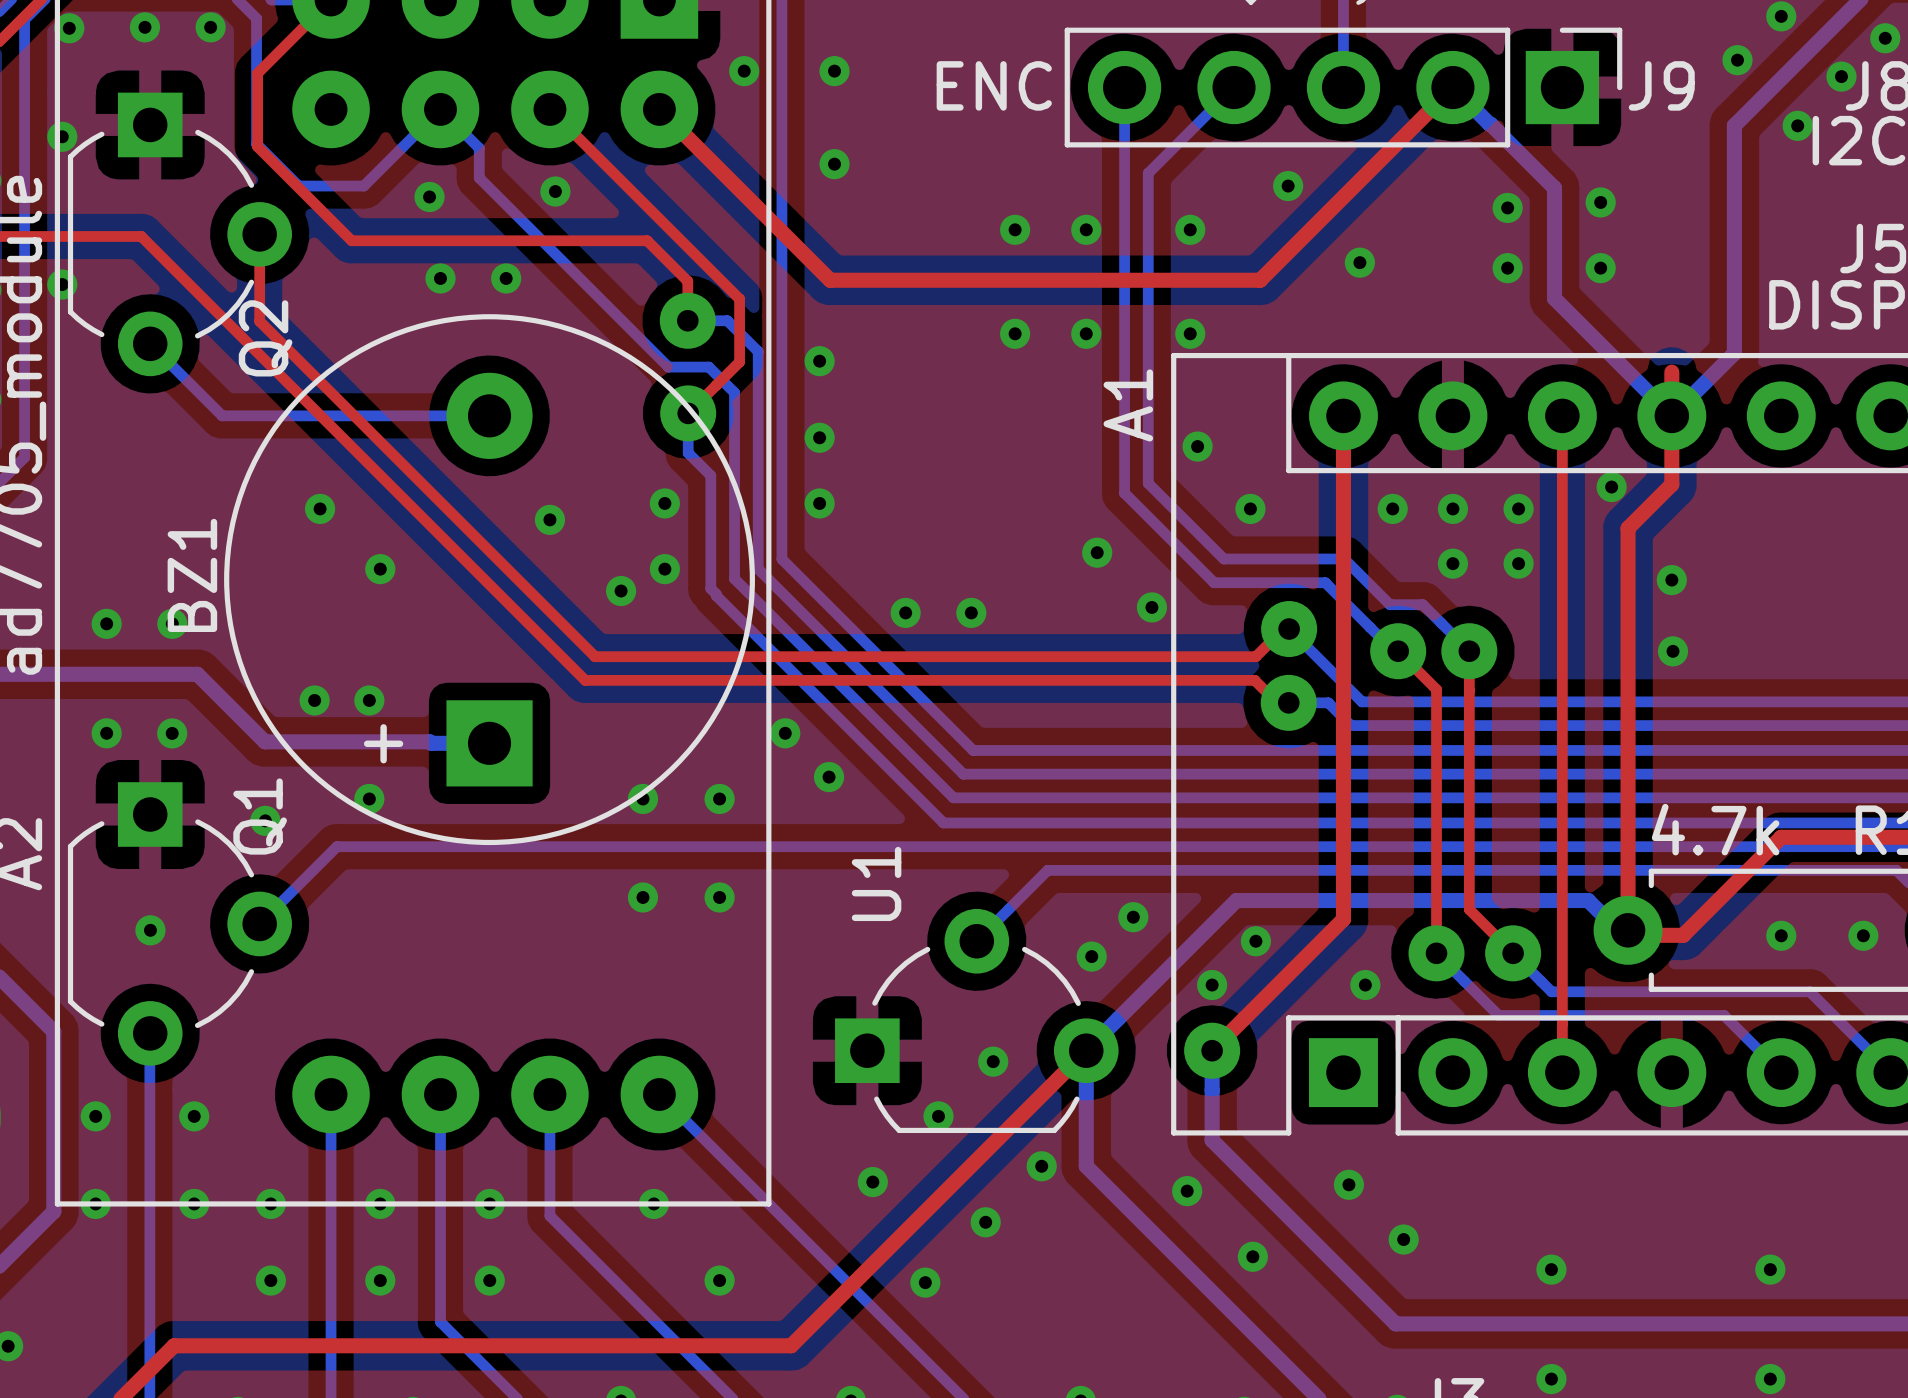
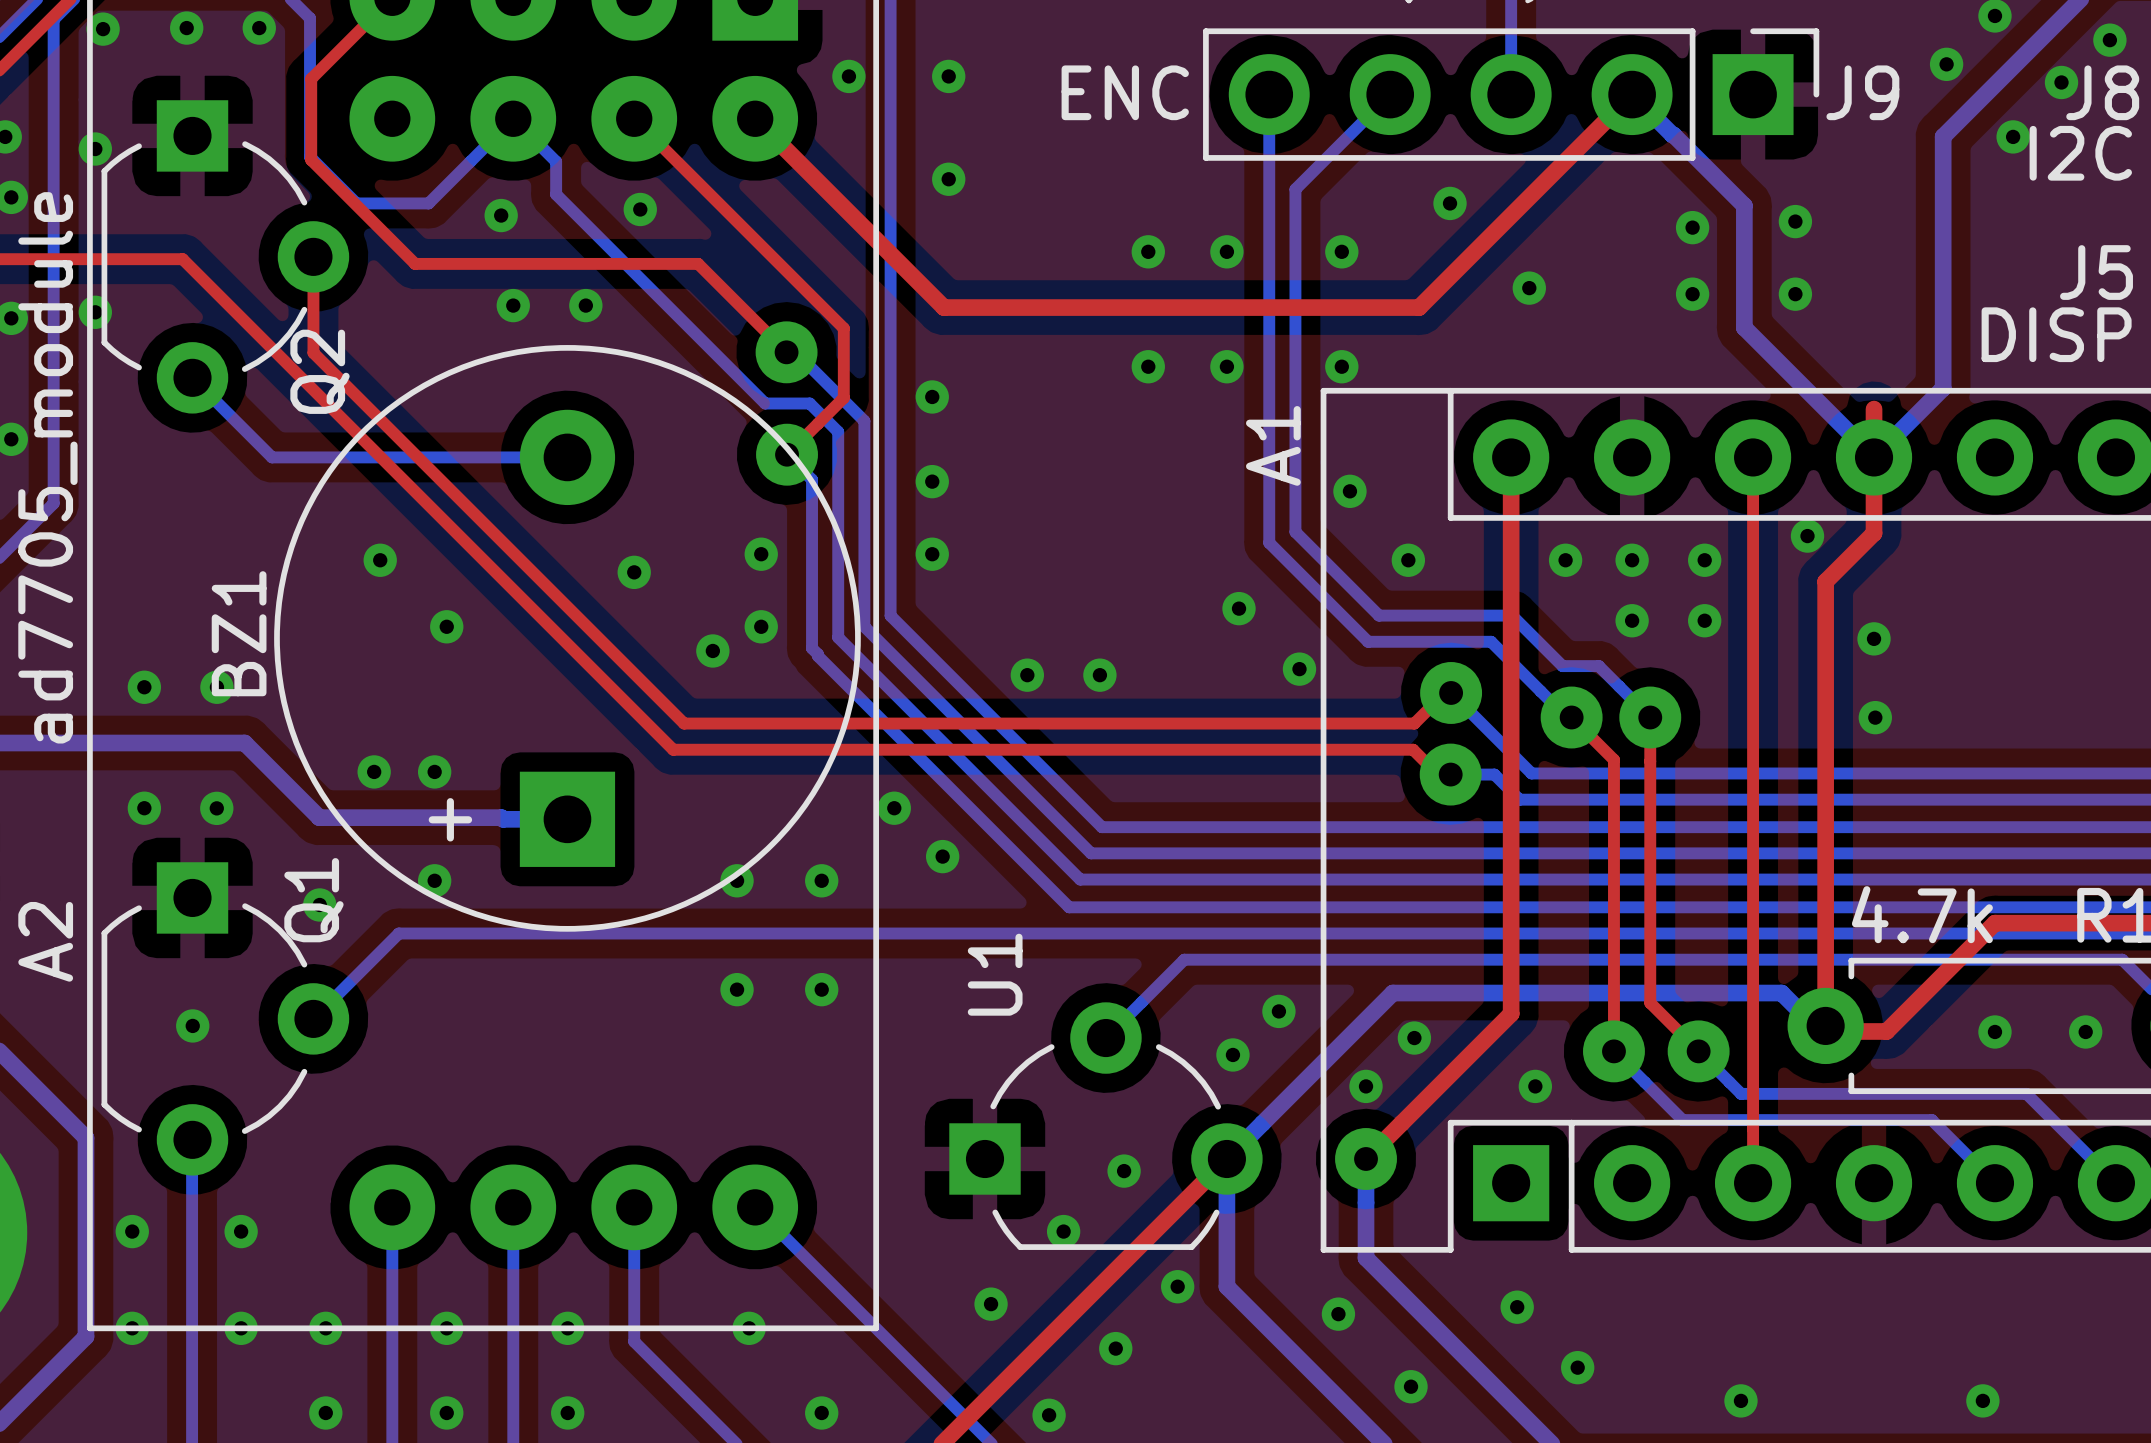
top track: (607, 240) (647, 240) (687, 281) (687, 320) -> (698, 263) (786, 352)
bottom track: (696, 320) (727, 320) (758, 351) (758, 382) -> (795, 352) (864, 421)
bottom track: (688, 413) (688, 453) (710, 475) -> (787, 454) (812, 479) (812, 523)

